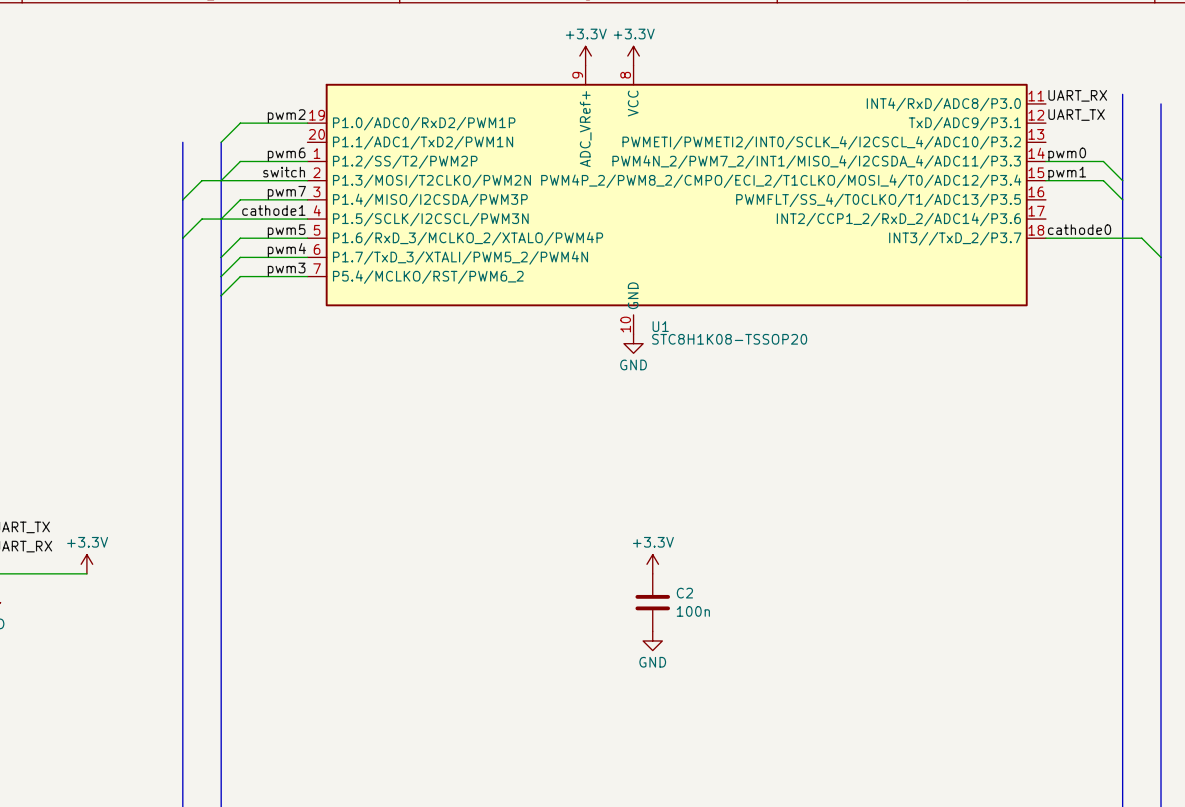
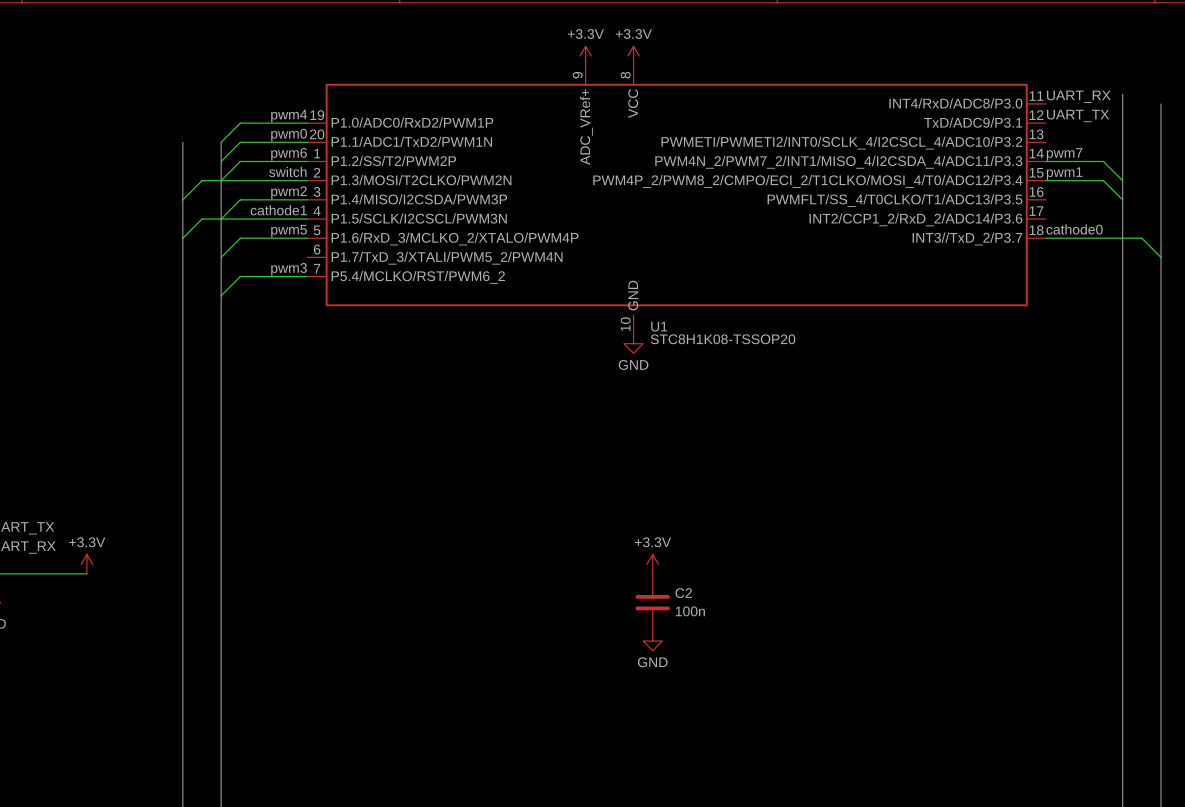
label: pwm2 (286, 116) -> pwm4 (289, 116)
label: none -> pwm0 (289, 135)
label: pwm0 (1067, 154) -> pwm7 (1064, 154)
label: pwm7 (286, 192) -> pwm2 (289, 192)
label: pwm4 (286, 250) -> none
wire: (307, 257) (240, 257) (221, 276) -> (307, 142) (240, 142) (221, 161)

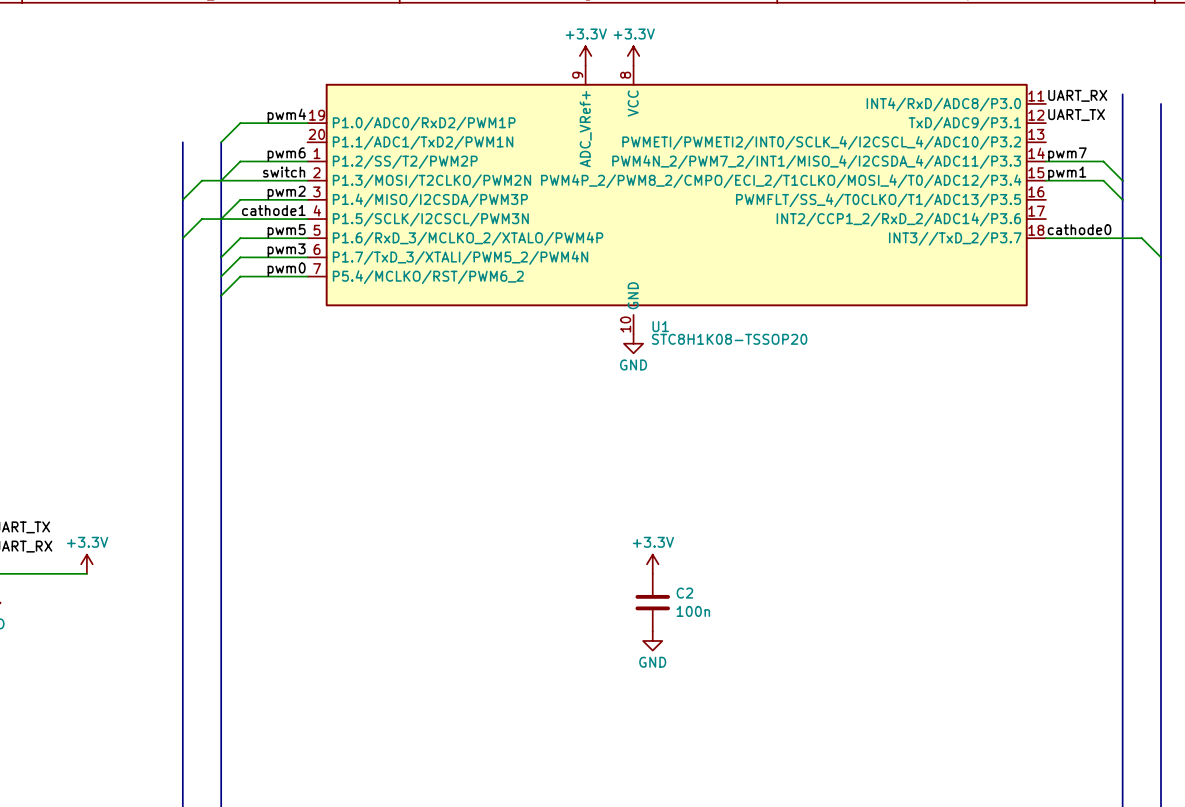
label: pwm0 (289, 135) -> none
wire: (307, 142) (240, 142) (221, 161) -> (307, 257) (240, 257) (221, 276)
label: none -> pwm3 (286, 250)
label: pwm3 (289, 269) -> pwm0 (286, 269)

